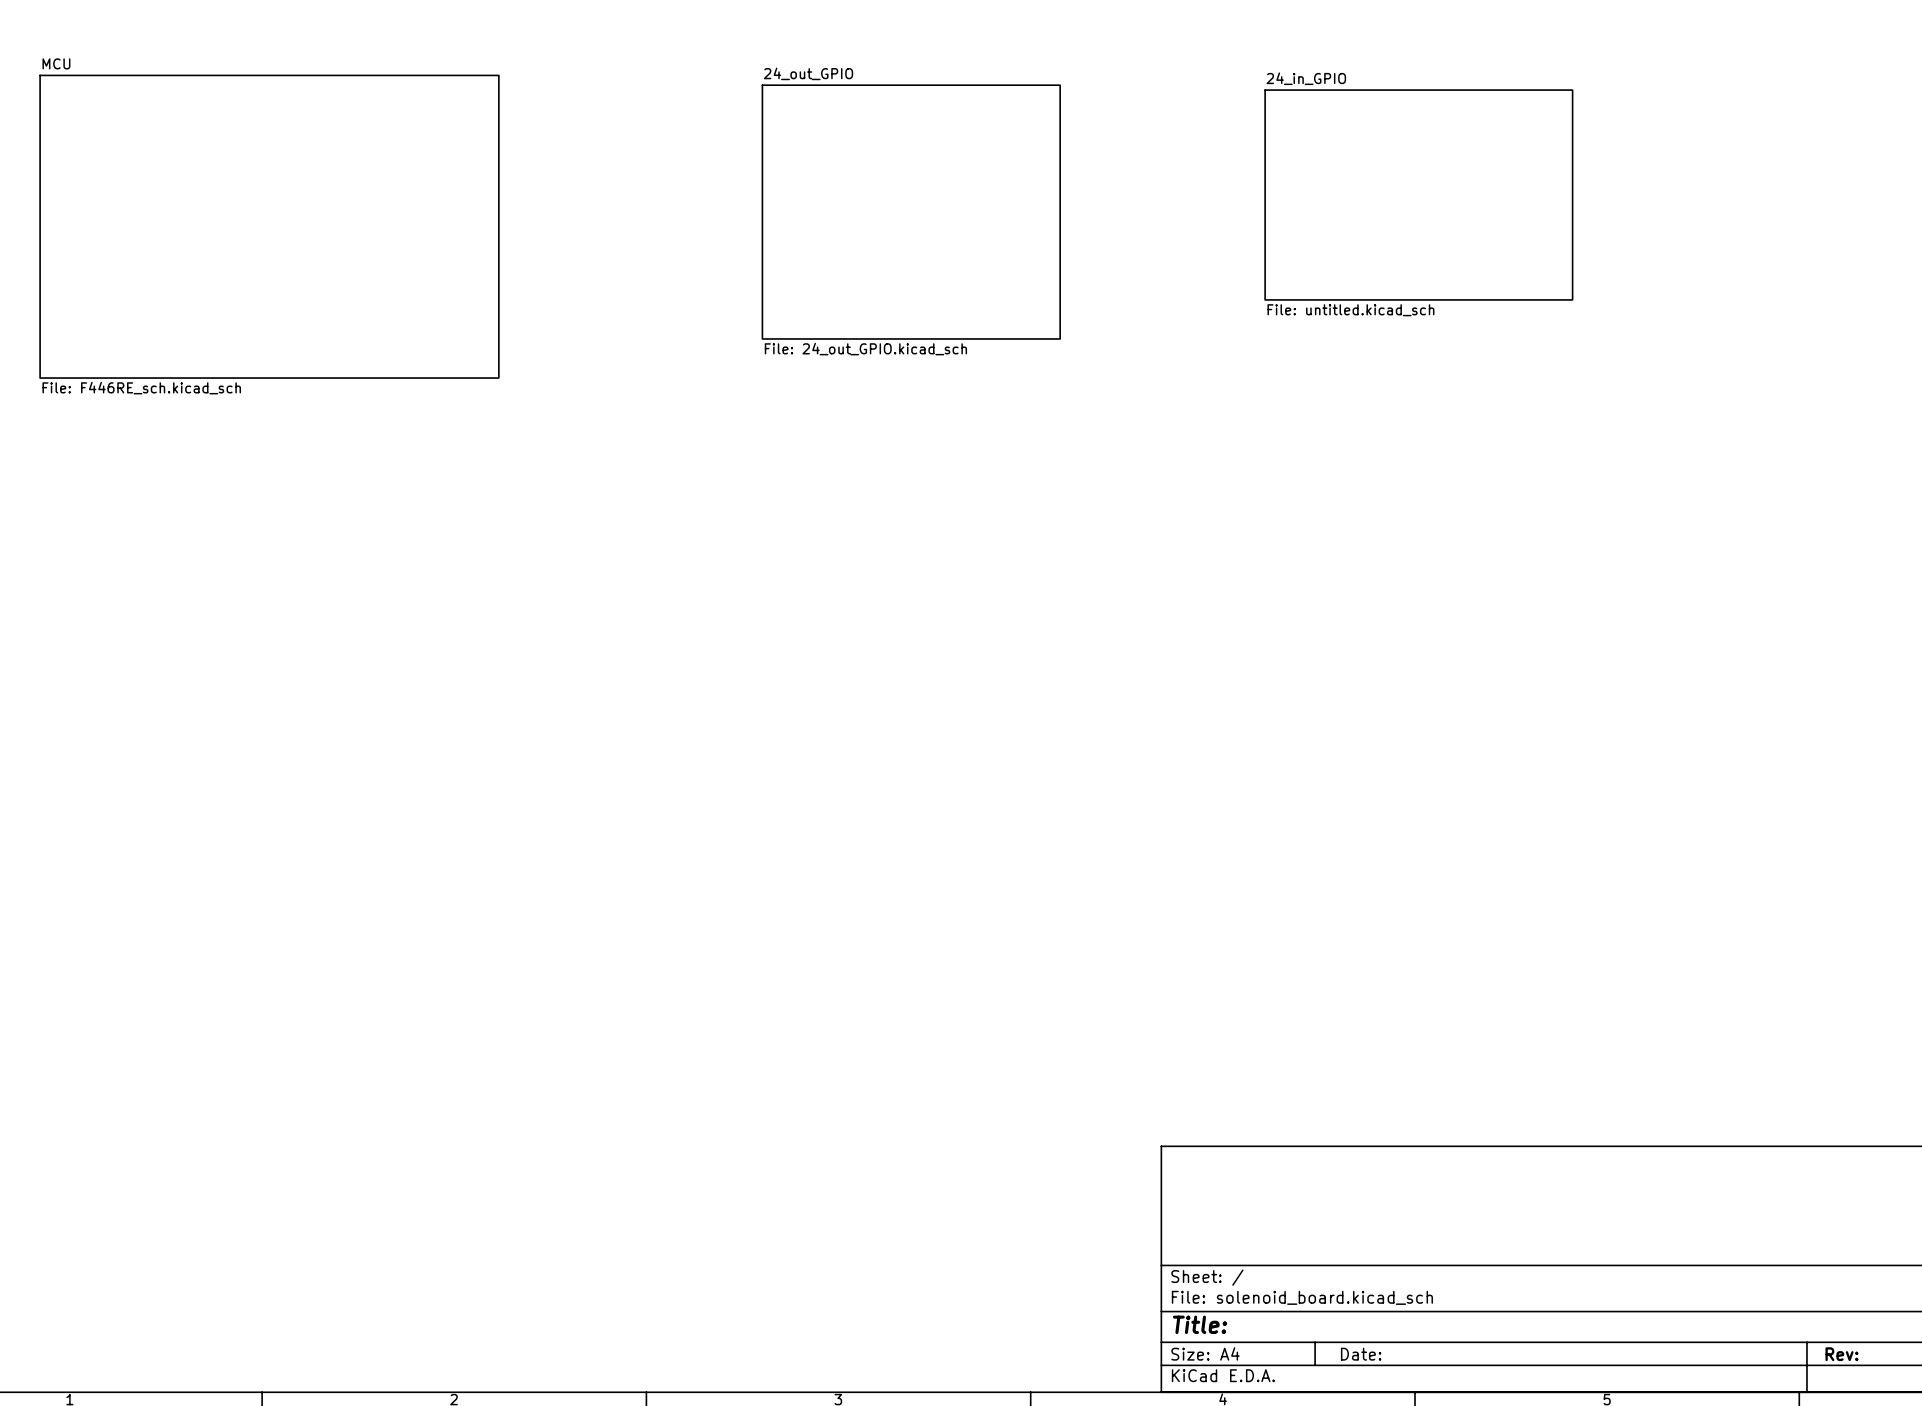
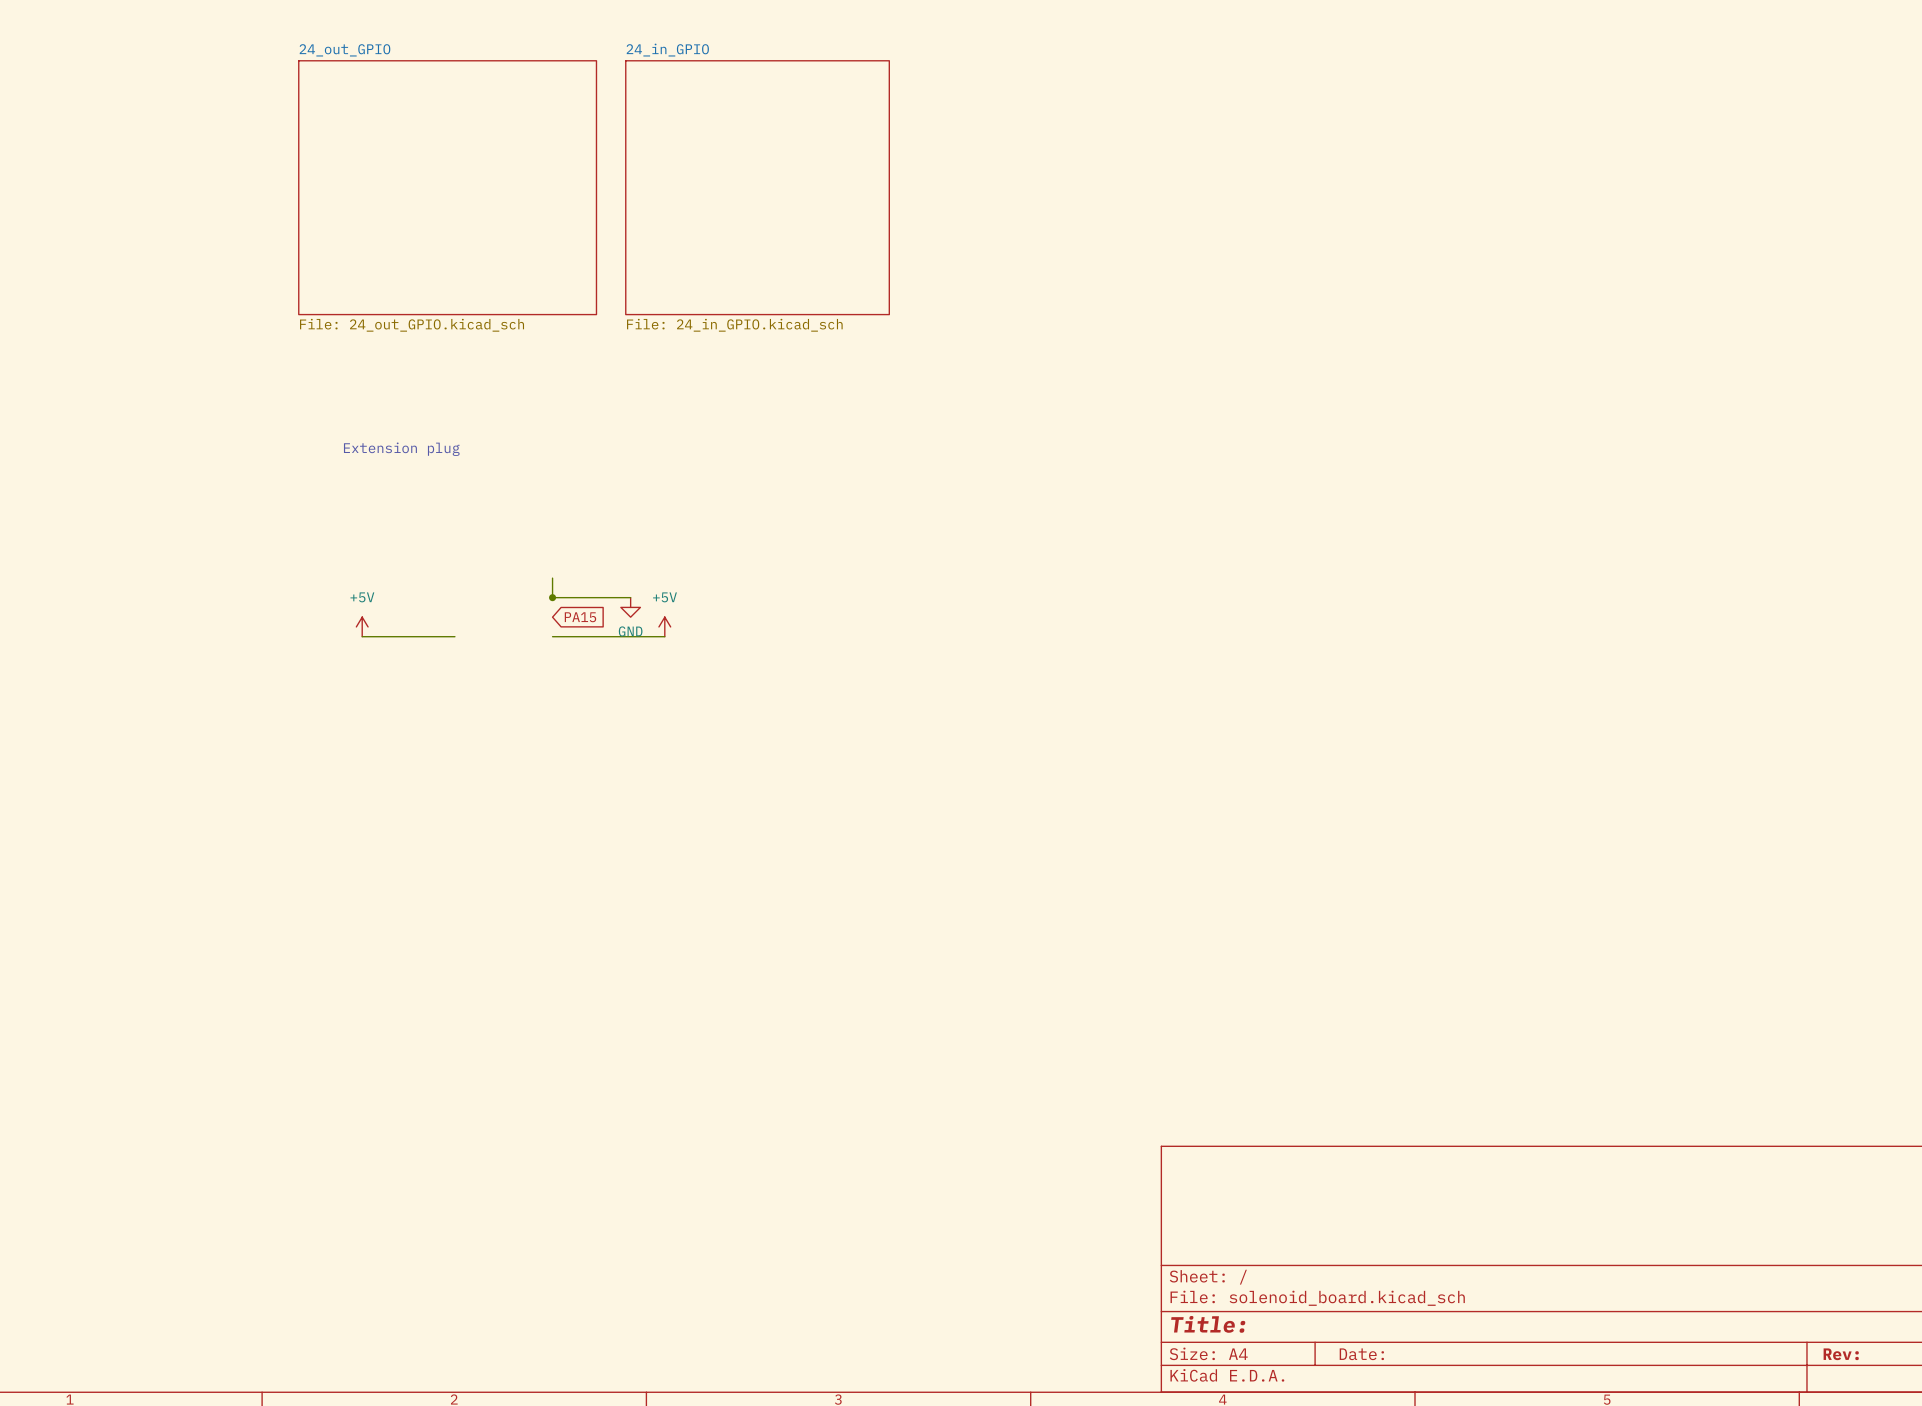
sheet 24_in_GPIO name position: 24_in_GPIO (1306, 78) -> 24_in_GPIO (667, 50)
sheet 24_in_GPIO shape: [1264, 89, 1574, 301] -> [625, 60, 890, 316]
sheet 24_out_GPIO position: (911, 212) -> (447, 187)
sheet MCU: File: F446RE_sch.kicad_sch (269, 226) -> none
sheet 24_in_GPIO value: File: untitled.kicad_sch (1350, 310) -> File: 24_in_GPIO.kicad_sch (734, 325)
text: none -> Extension plug (401, 449)
wire: none -> (552, 578) (552, 597) (630, 597)
junction: none -> (552, 597)
power symbol: none -> GND (630, 607)
global label: none -> PA15 (580, 617)
power symbol: none -> +5V (362, 626)
power symbol: none -> +5V (664, 626)
wire: none -> (362, 636) (454, 636)
wire: none -> (552, 636) (664, 636)

